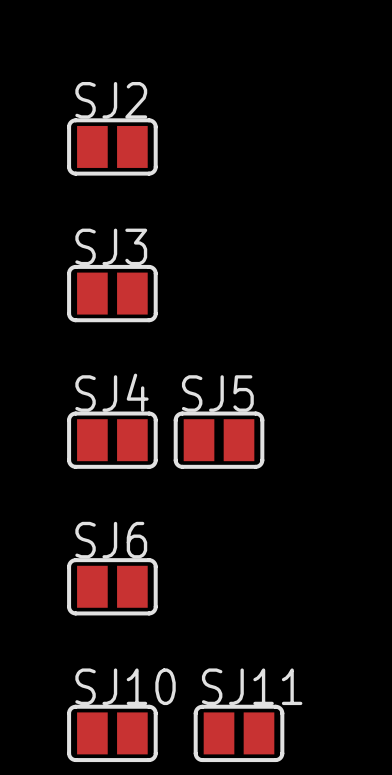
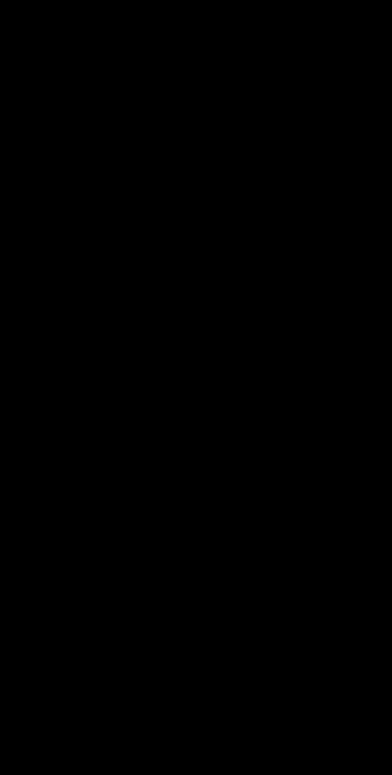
SJ2: (112, 146) -> none
SJ3: (112, 293) -> none
SJ4: (112, 440) -> none
SJ5: (219, 440) -> none
SJ6: (112, 586) -> none
SJ10: (112, 733) -> none
SJ11: (239, 733) -> none

